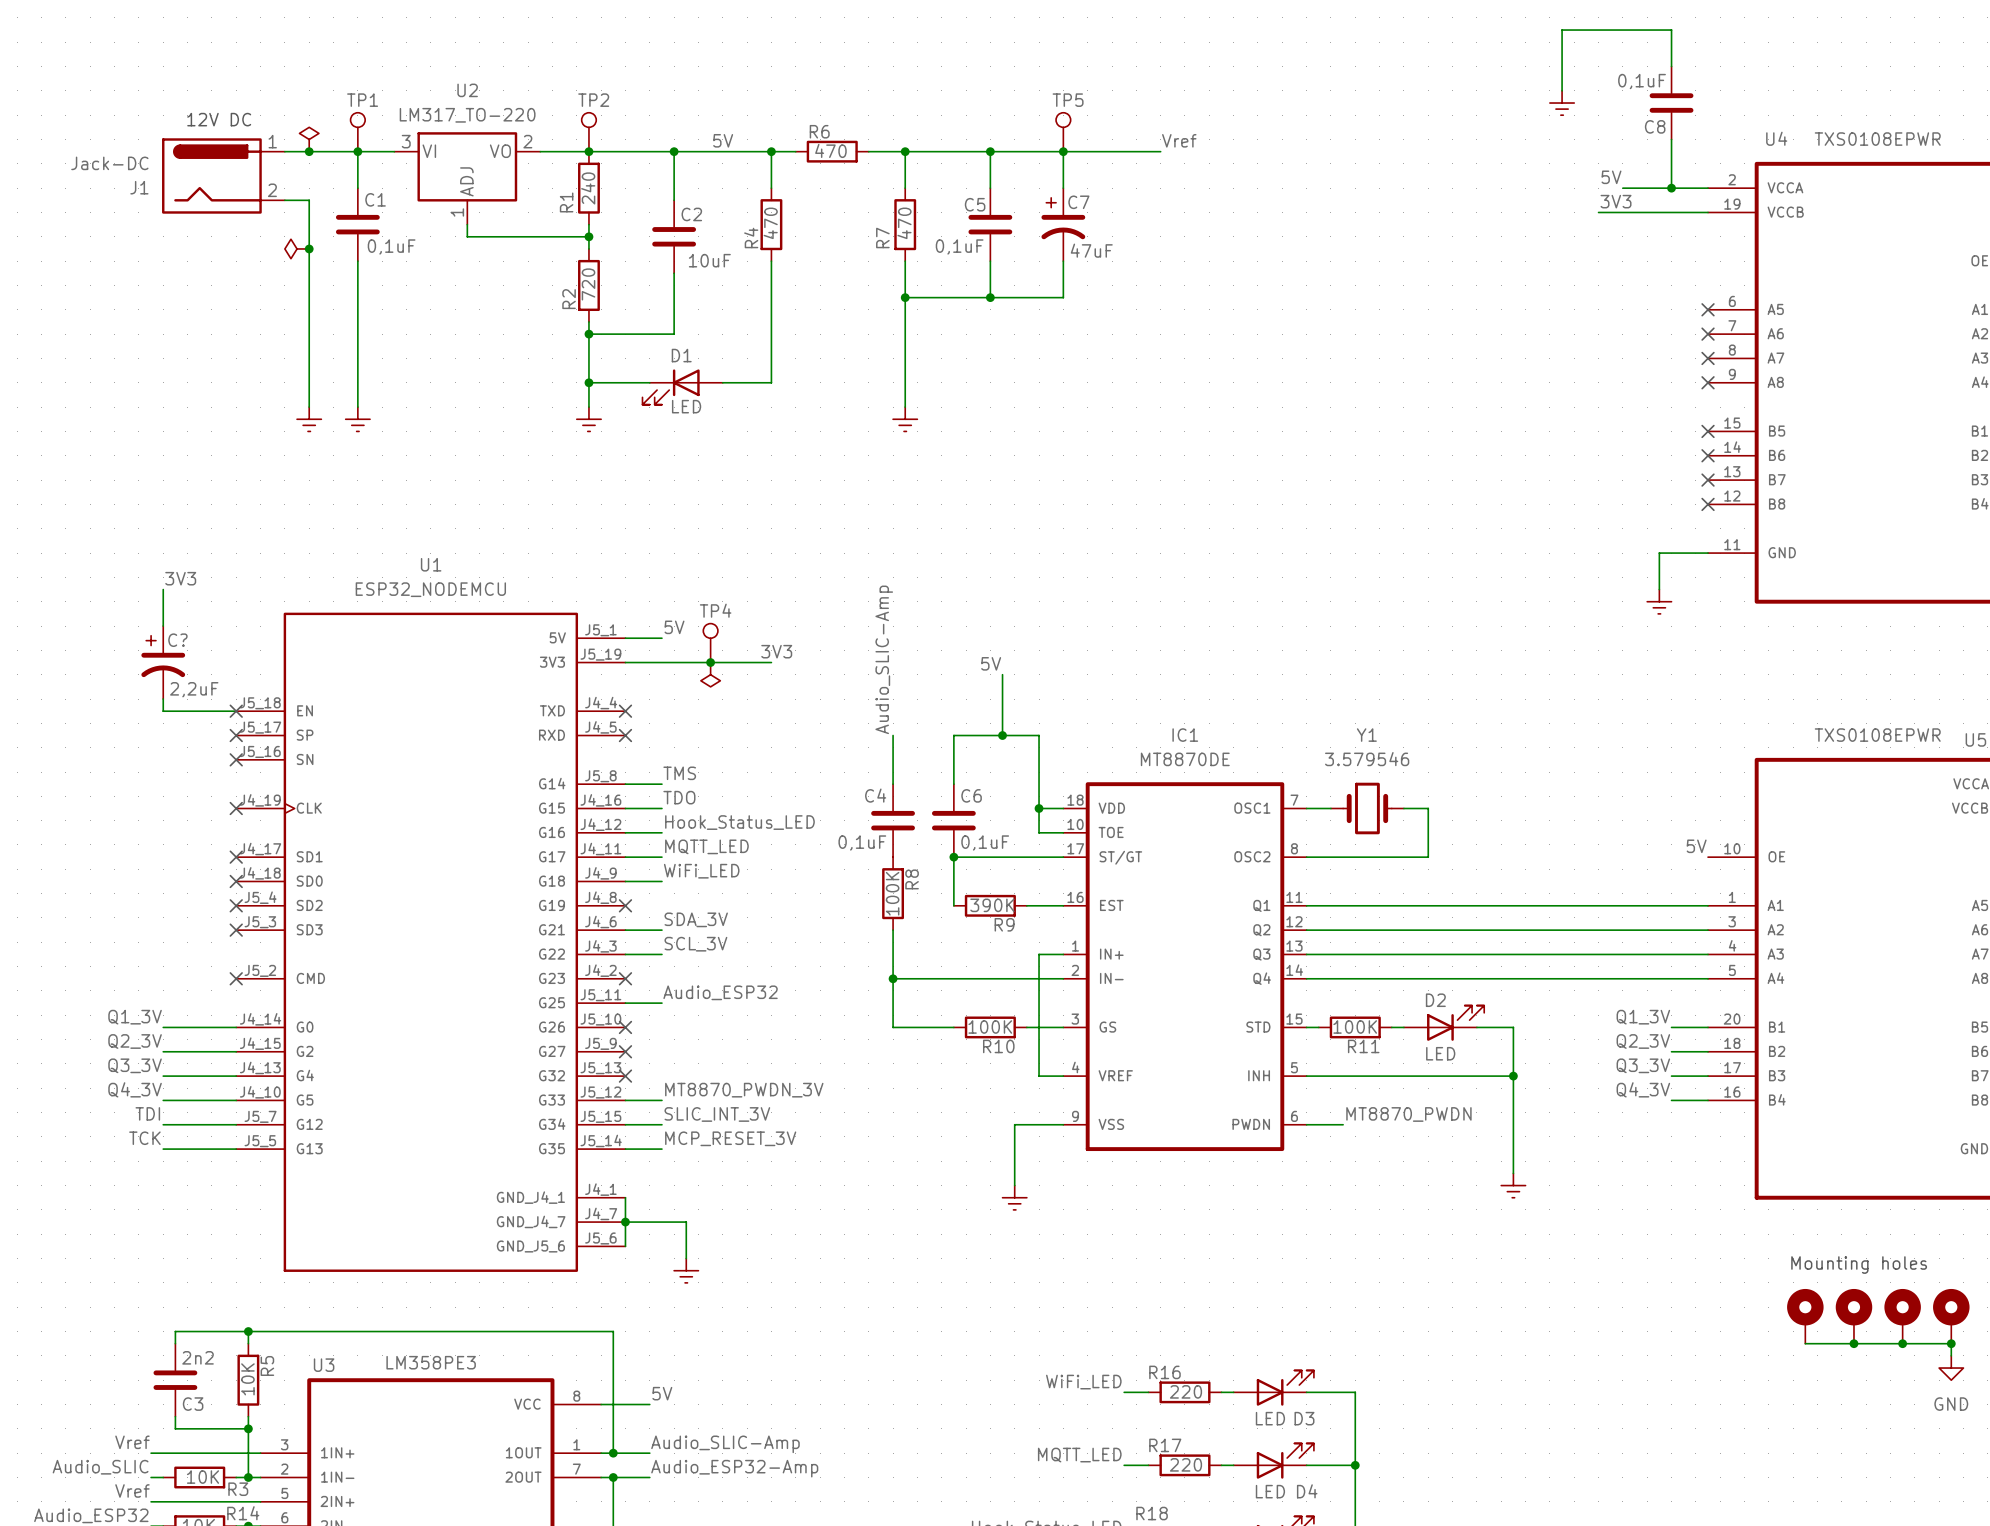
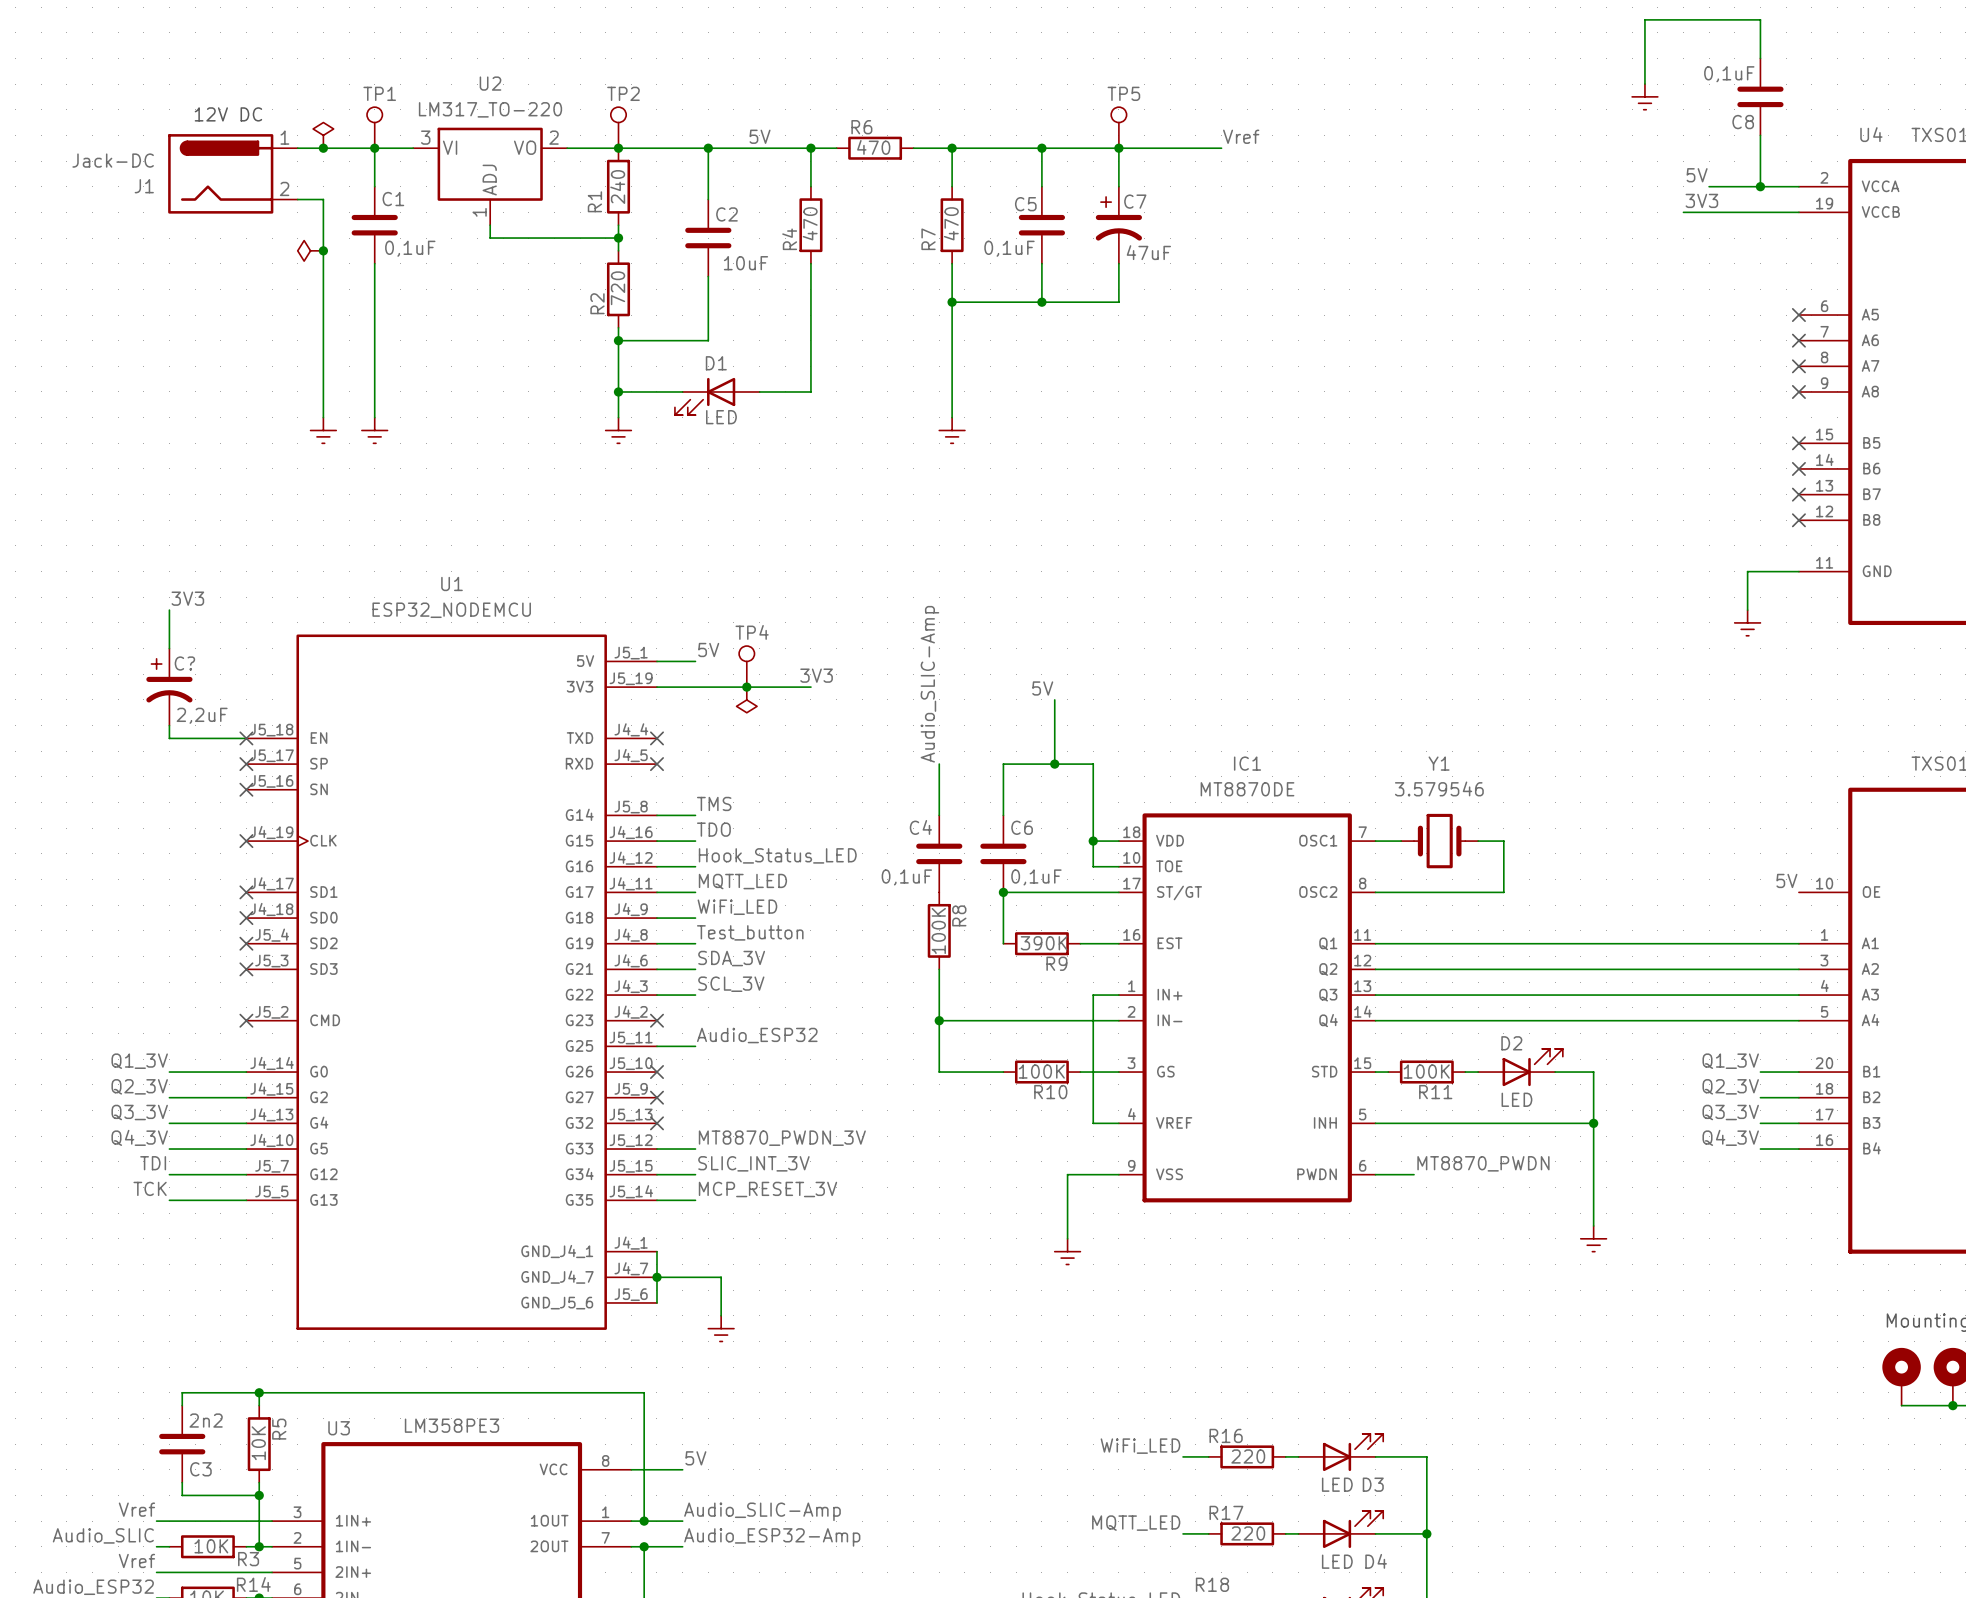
label: none -> Test_button (750, 932)
wire: none -> (656, 943) (695, 943)
no-connect mark: (625, 905) -> none

